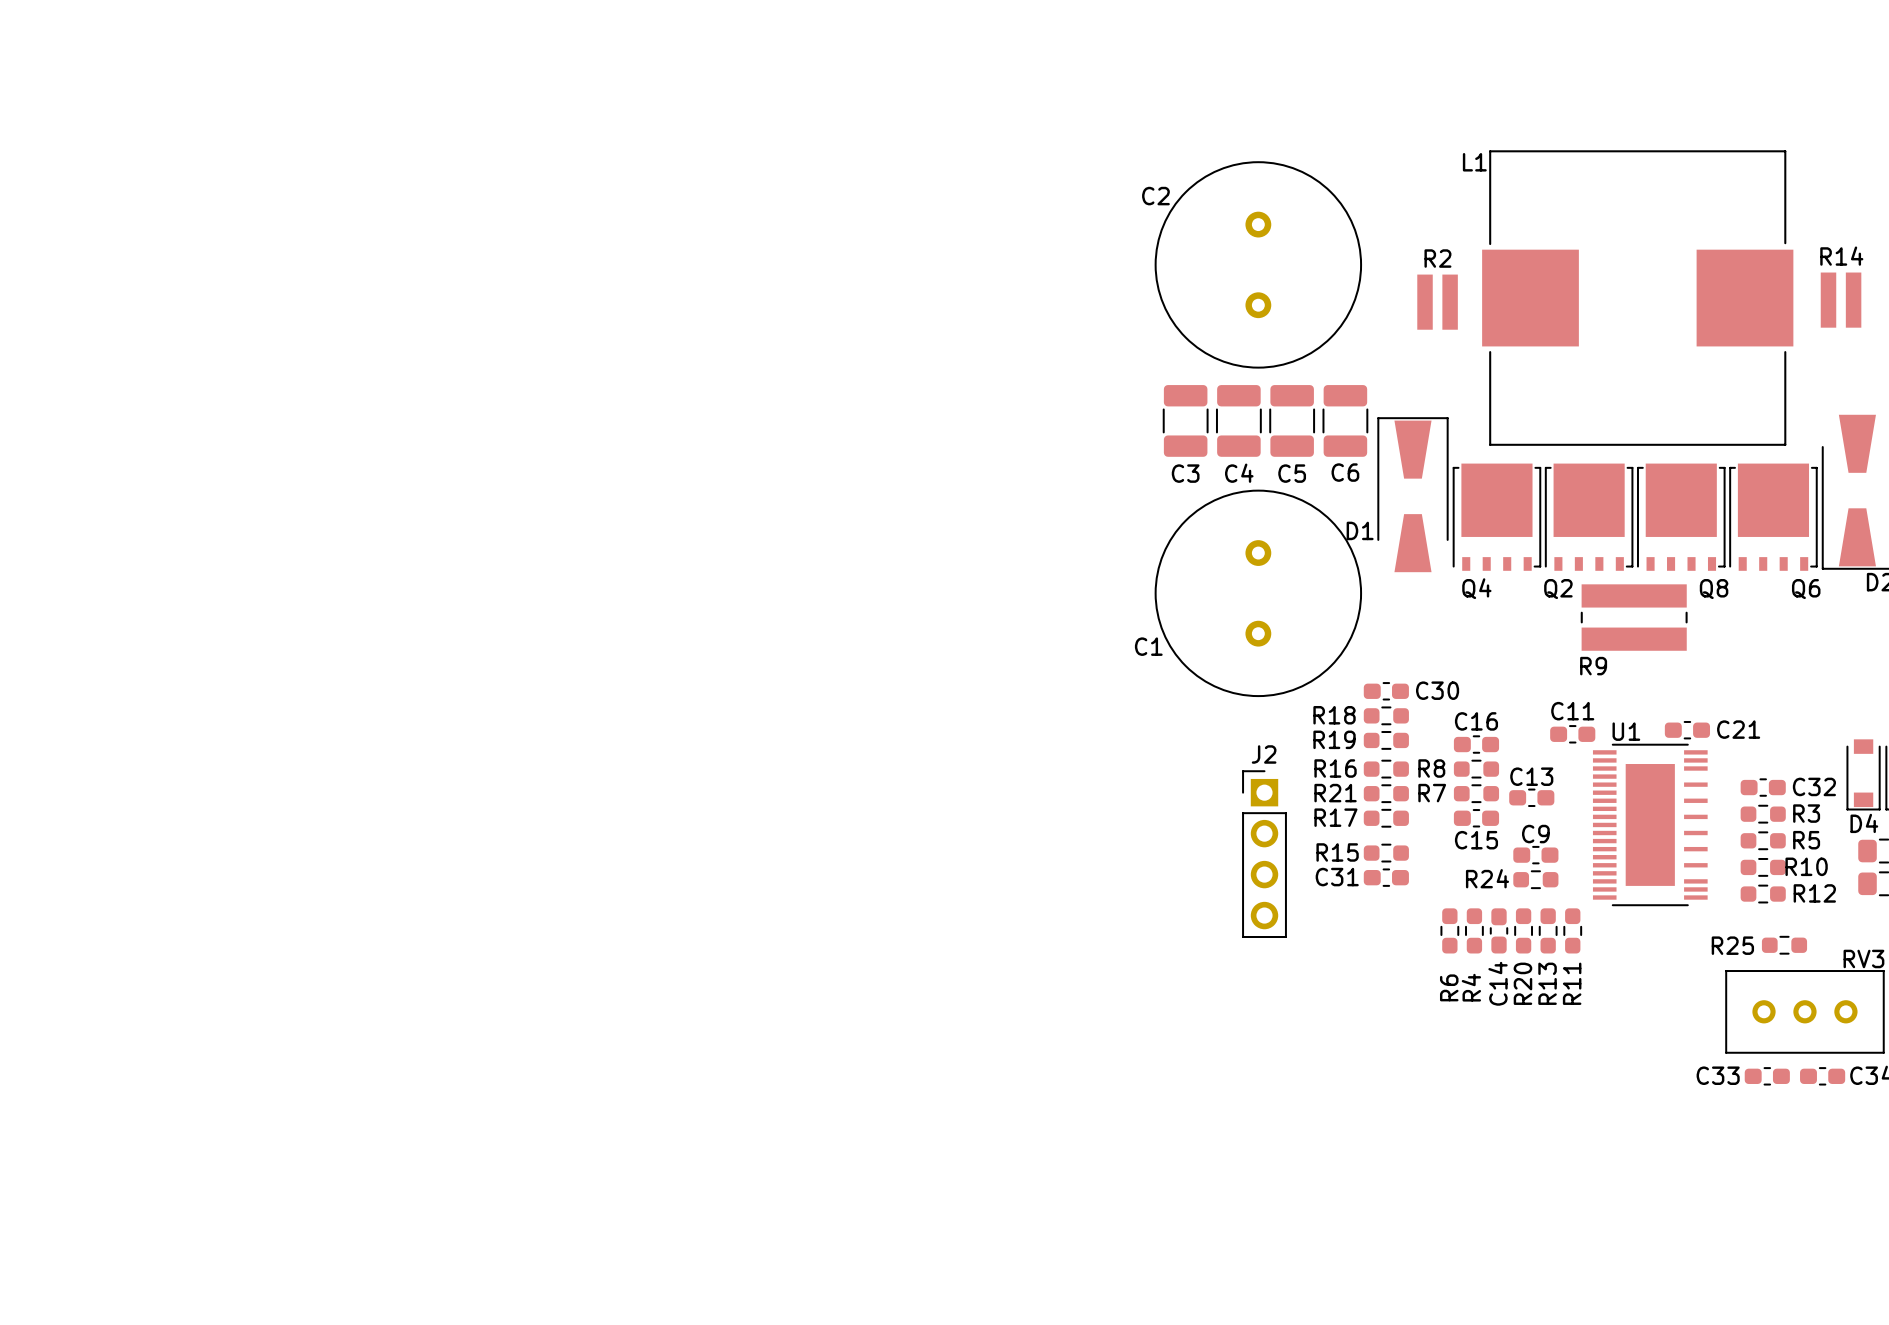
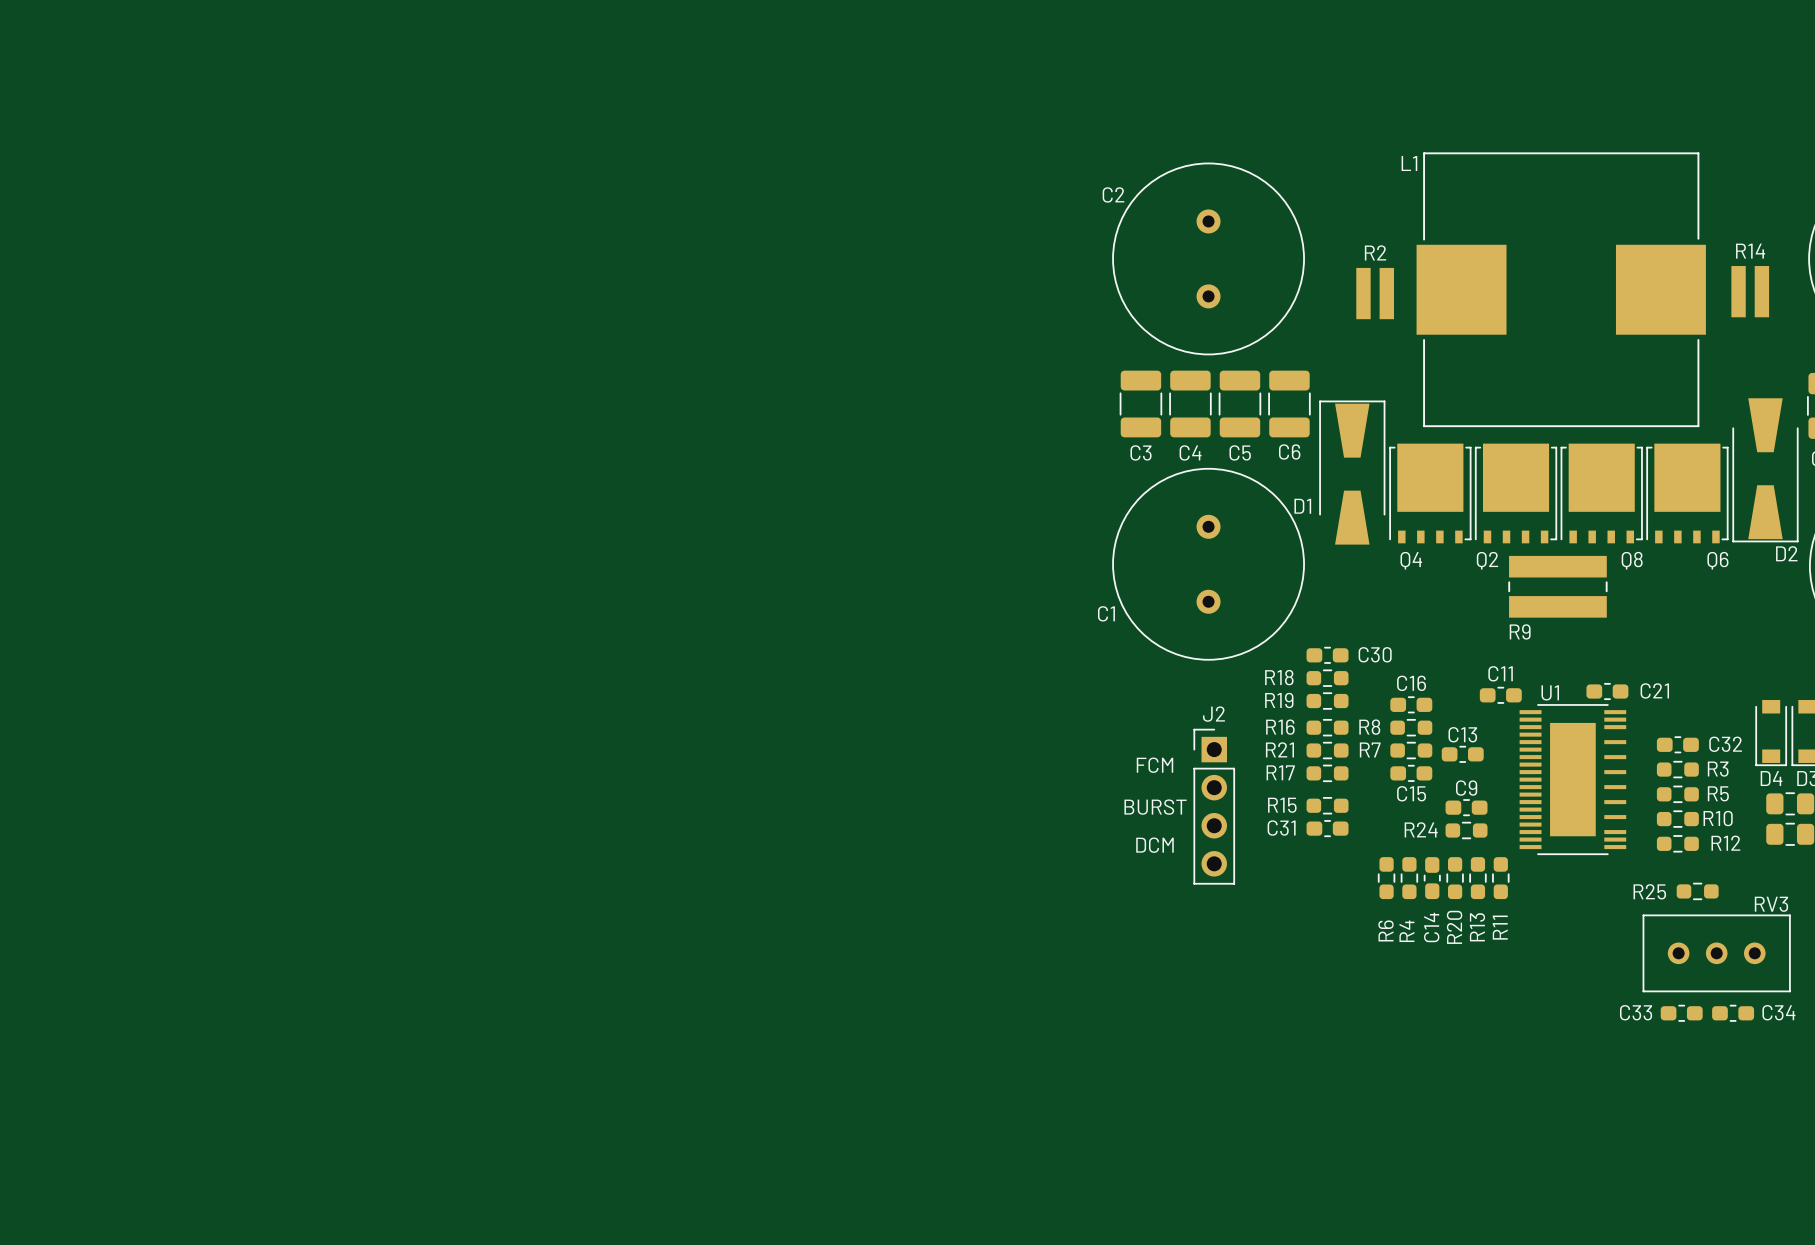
text: none -> FCM (1154, 765)
text: none -> BURST (1155, 807)
text: none -> DCM (1154, 845)

